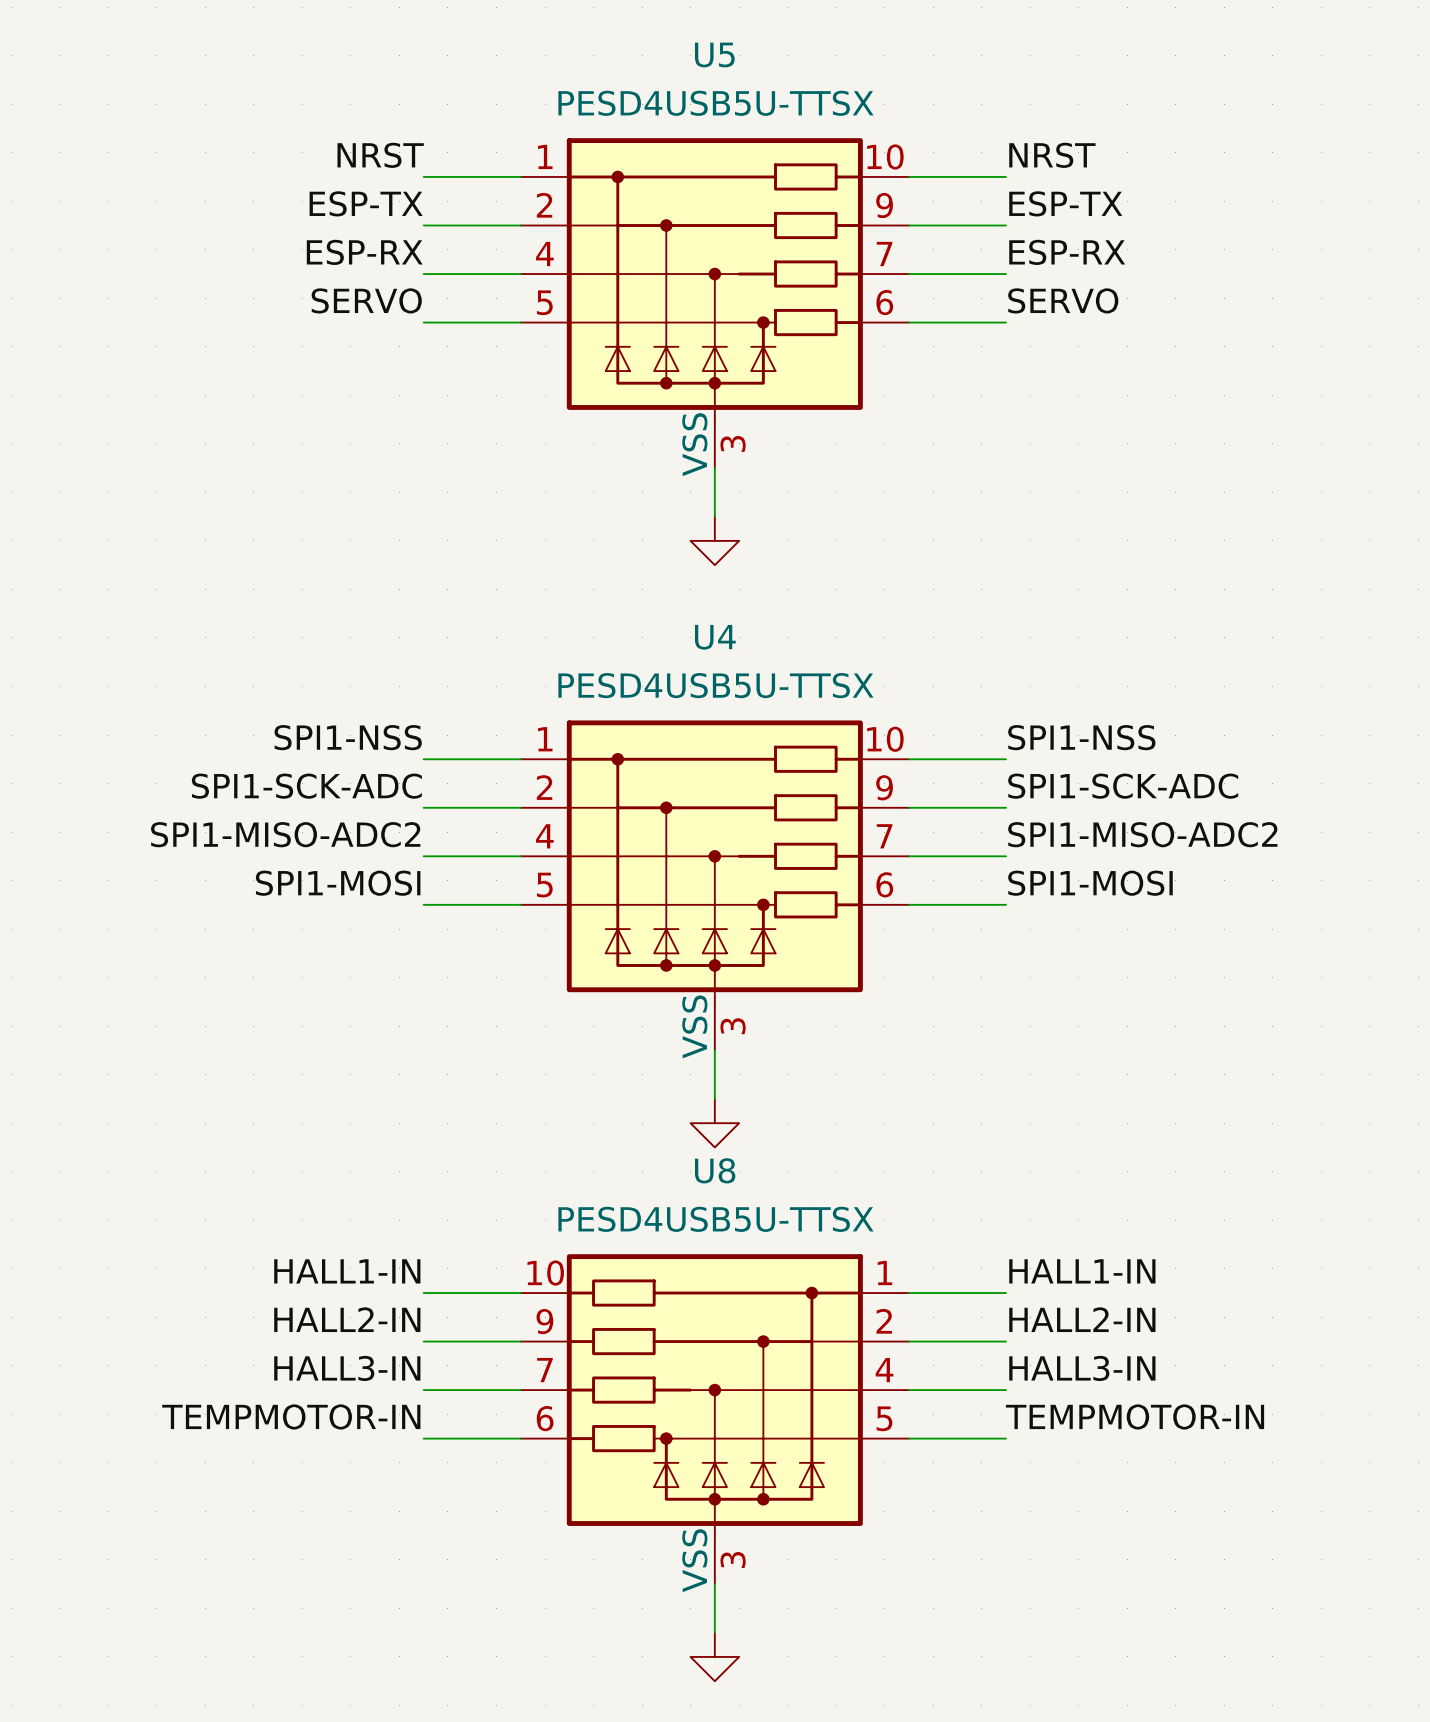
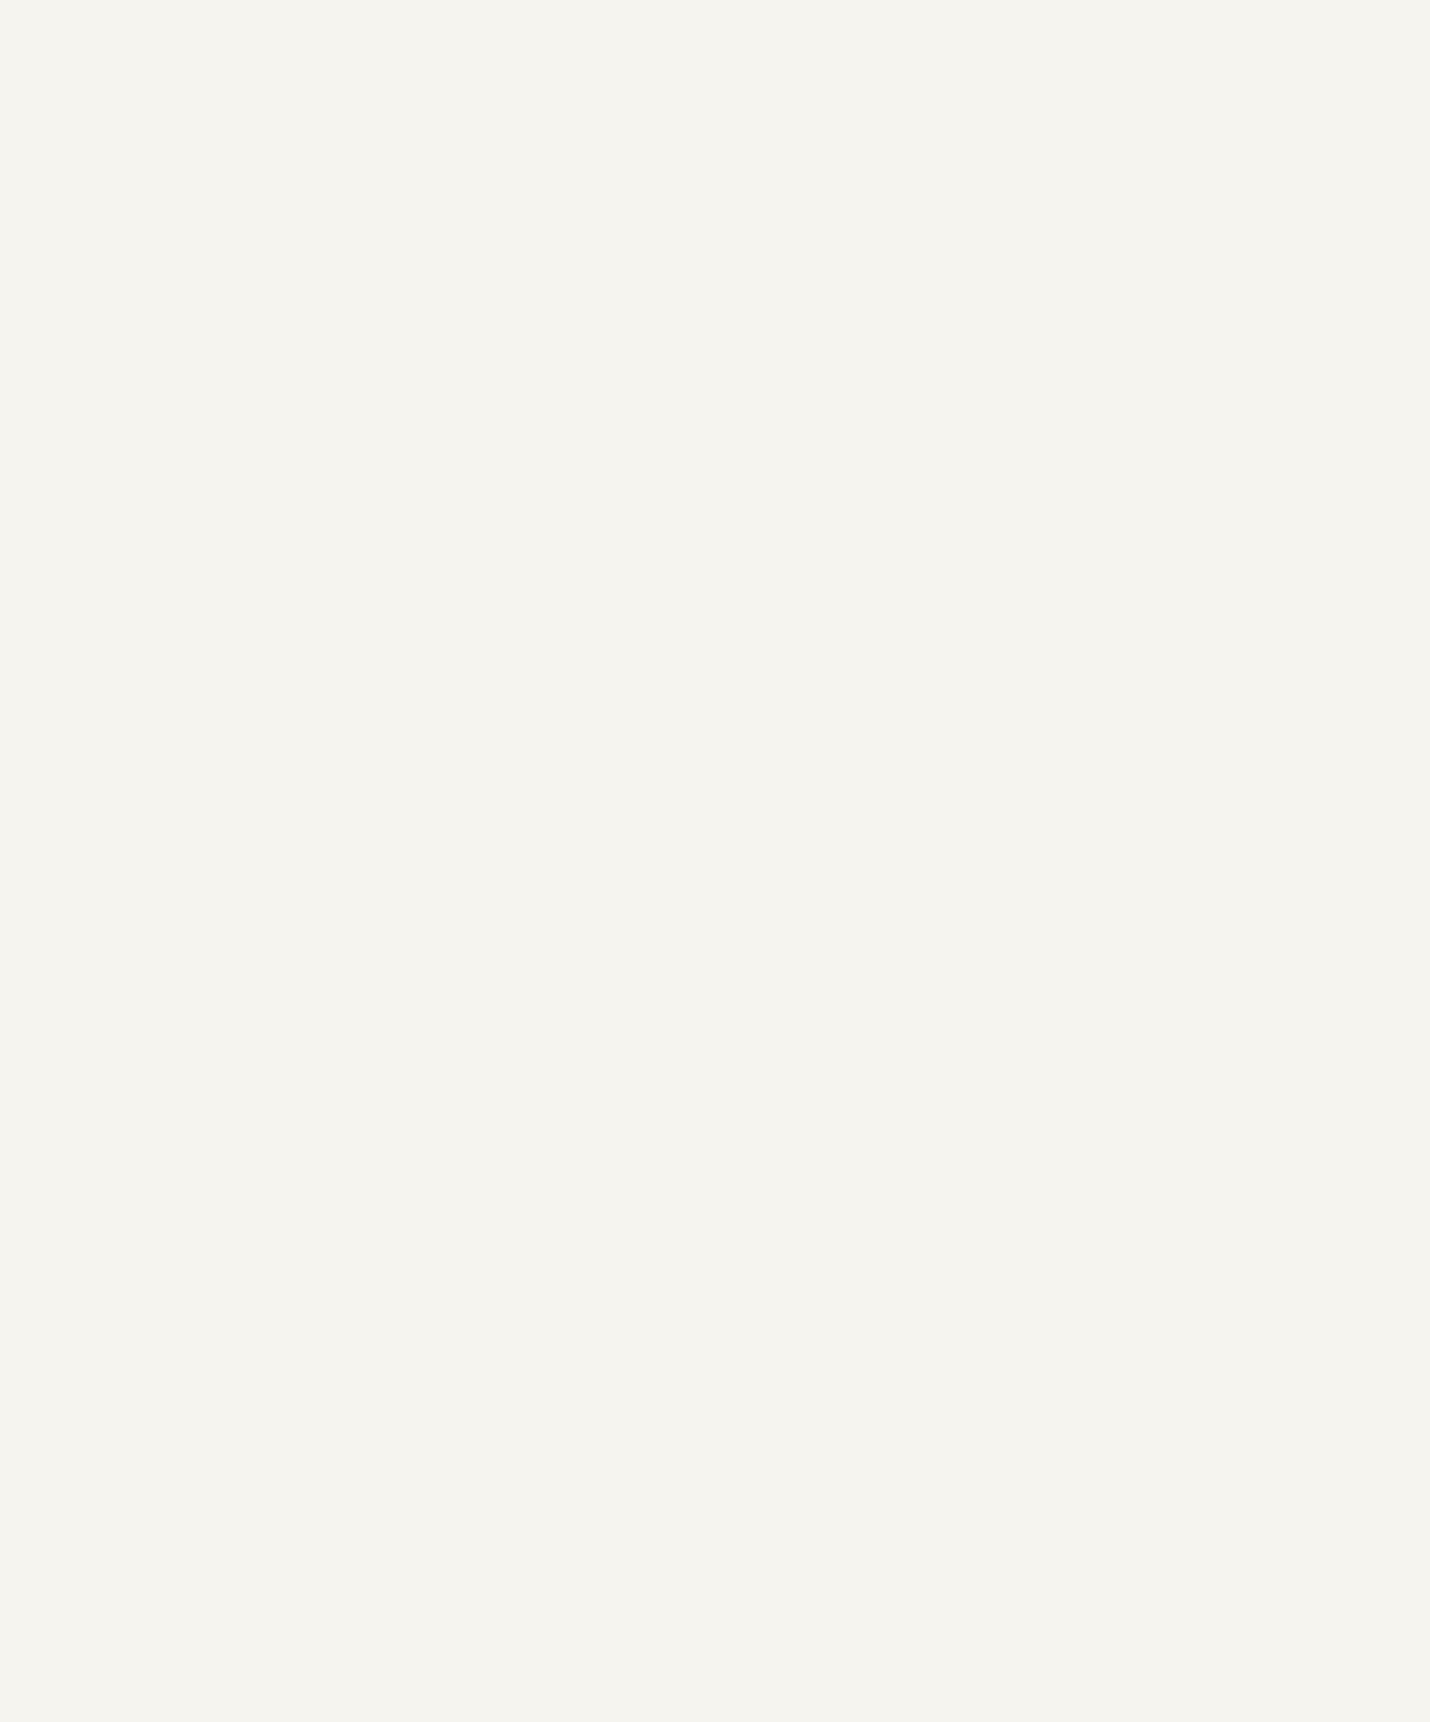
label: NRST (380, 155) -> none
label: NRST (1052, 155) -> none
wire: (423, 176) (520, 176) -> none
wire: (908, 176) (1005, 176) -> none
label: ESP-TX (366, 203) -> none
label: ESP-TX (1065, 203) -> none
wire: (423, 225) (520, 225) -> none
wire: (908, 225) (1005, 225) -> none
label: ESP-RX (364, 252) -> none
label: ESP-RX (1067, 252) -> none
wire: (423, 274) (520, 274) -> none
wire: (908, 274) (1005, 274) -> none
label: SERVO (366, 300) -> none
label: SERVO (1063, 300) -> none
U5: PESD4USB5U-TTSX (714, 303) -> none
wire: (423, 322) (520, 322) -> none
wire: (908, 322) (1005, 322) -> none
wire: (714, 468) (714, 516) -> none
power symbol: (714, 540) -> none
label: SPI1-NSS (348, 737) -> none
label: SPI1-NSS (1081, 737) -> none
wire: (423, 759) (520, 759) -> none
wire: (908, 759) (1005, 759) -> none
label: SPI1-SCK-ADC (306, 786) -> none
label: SPI1-SCK-ADC (1123, 786) -> none
wire: (423, 807) (520, 807) -> none
wire: (908, 807) (1005, 807) -> none
label: SPI1-MISO-ADC2 (285, 834) -> none
label: SPI1-MISO-ADC2 (1142, 834) -> none
wire: (423, 856) (520, 856) -> none
wire: (908, 856) (1005, 856) -> none
label: SPI1-MOSI (338, 883) -> none
label: SPI1-MOSI (1090, 883) -> none
U4: PESD4USB5U-TTSX (714, 885) -> none
wire: (423, 904) (520, 904) -> none
wire: (908, 904) (1005, 904) -> none
wire: (714, 1050) (714, 1098) -> none
power symbol: (714, 1123) -> none
label: HALL1-IN (347, 1271) -> none
label: HALL1-IN (1082, 1271) -> none
wire: (423, 1293) (520, 1293) -> none
wire: (908, 1293) (1005, 1293) -> none
label: HALL2-IN (347, 1319) -> none
label: HALL2-IN (1082, 1319) -> none
wire: (423, 1341) (520, 1341) -> none
wire: (908, 1341) (1005, 1341) -> none
label: HALL3-IN (347, 1368) -> none
label: HALL3-IN (1082, 1368) -> none
wire: (423, 1390) (520, 1390) -> none
wire: (908, 1390) (1005, 1390) -> none
label: TEMPMOTOR-IN (291, 1416) -> none
label: TEMPMOTOR-IN (1135, 1416) -> none
U8: PESD4USB5U-TTSX (714, 1419) -> none
wire: (423, 1438) (520, 1438) -> none
wire: (908, 1438) (1005, 1438) -> none
wire: (714, 1584) (714, 1632) -> none
power symbol: (714, 1656) -> none

